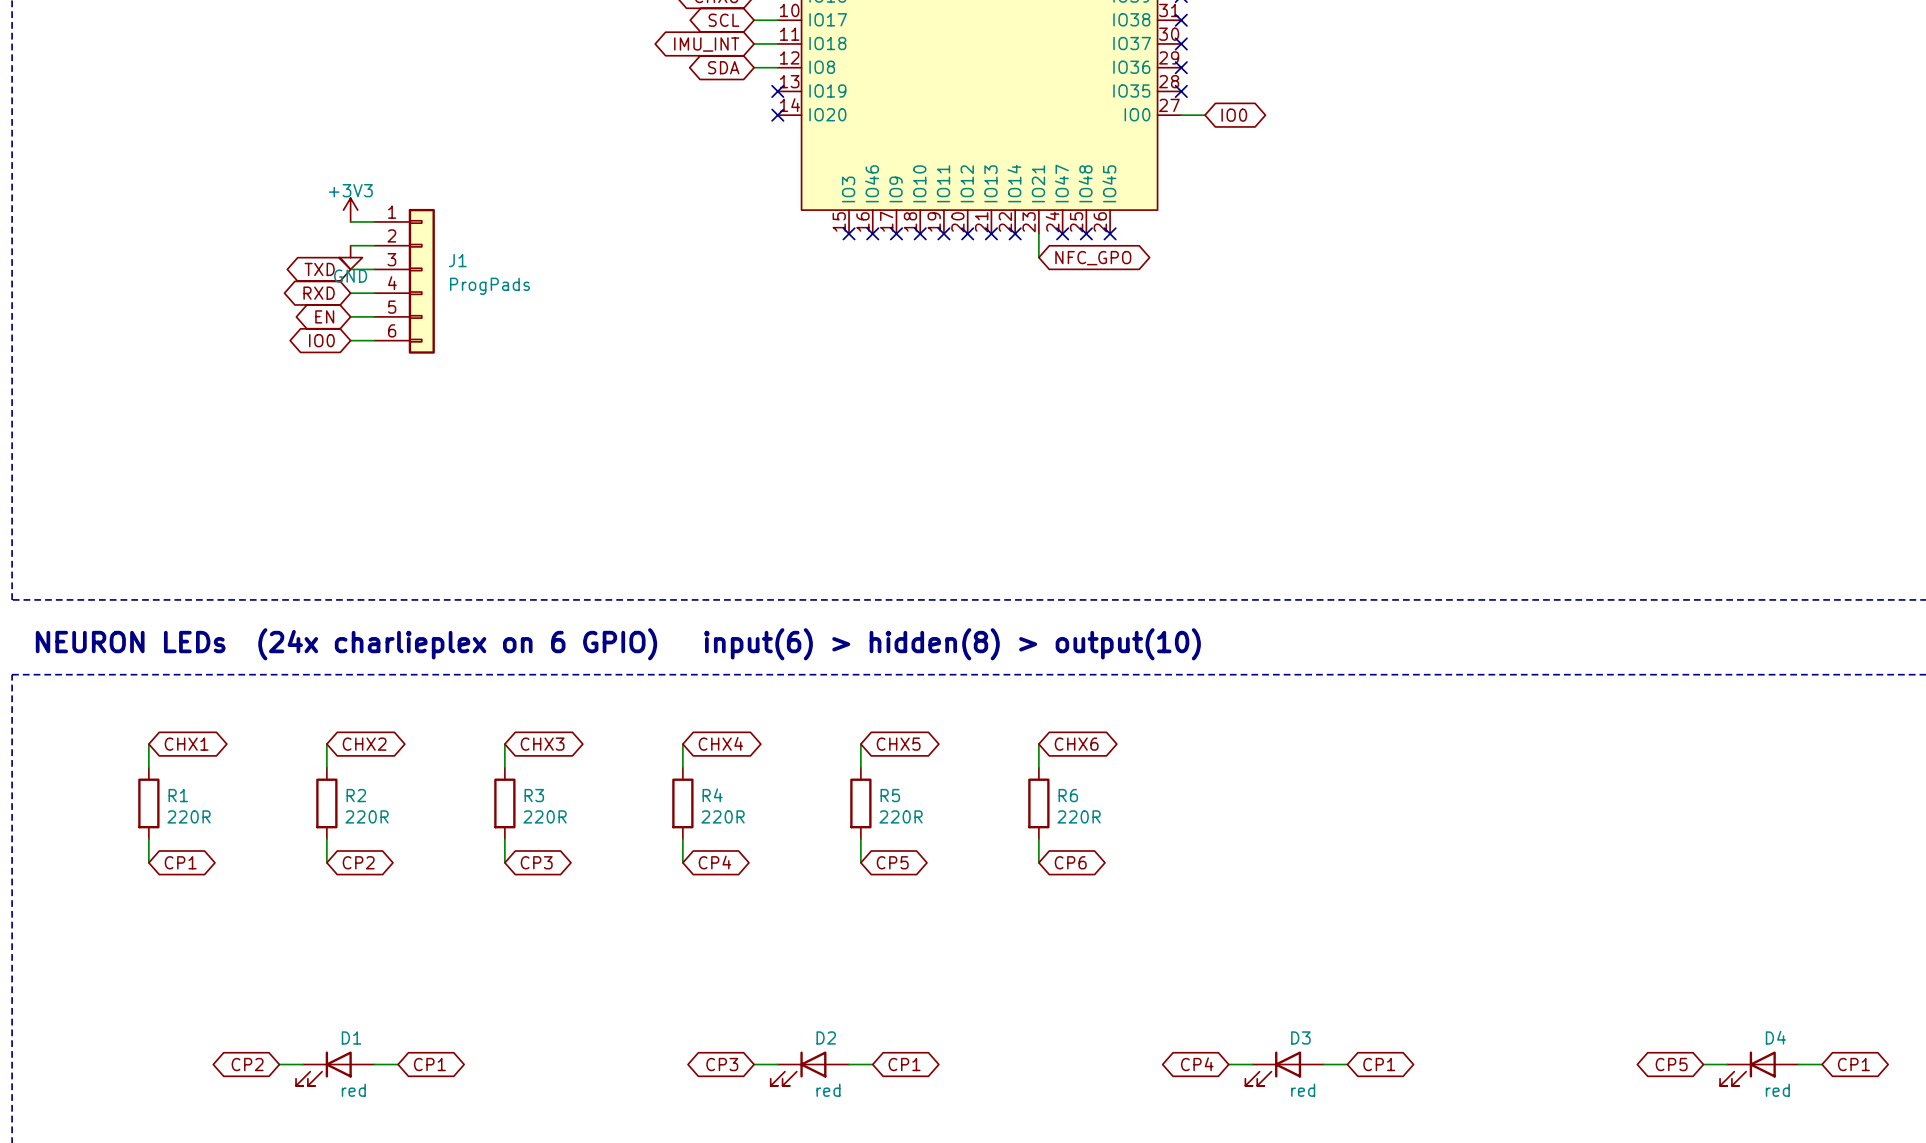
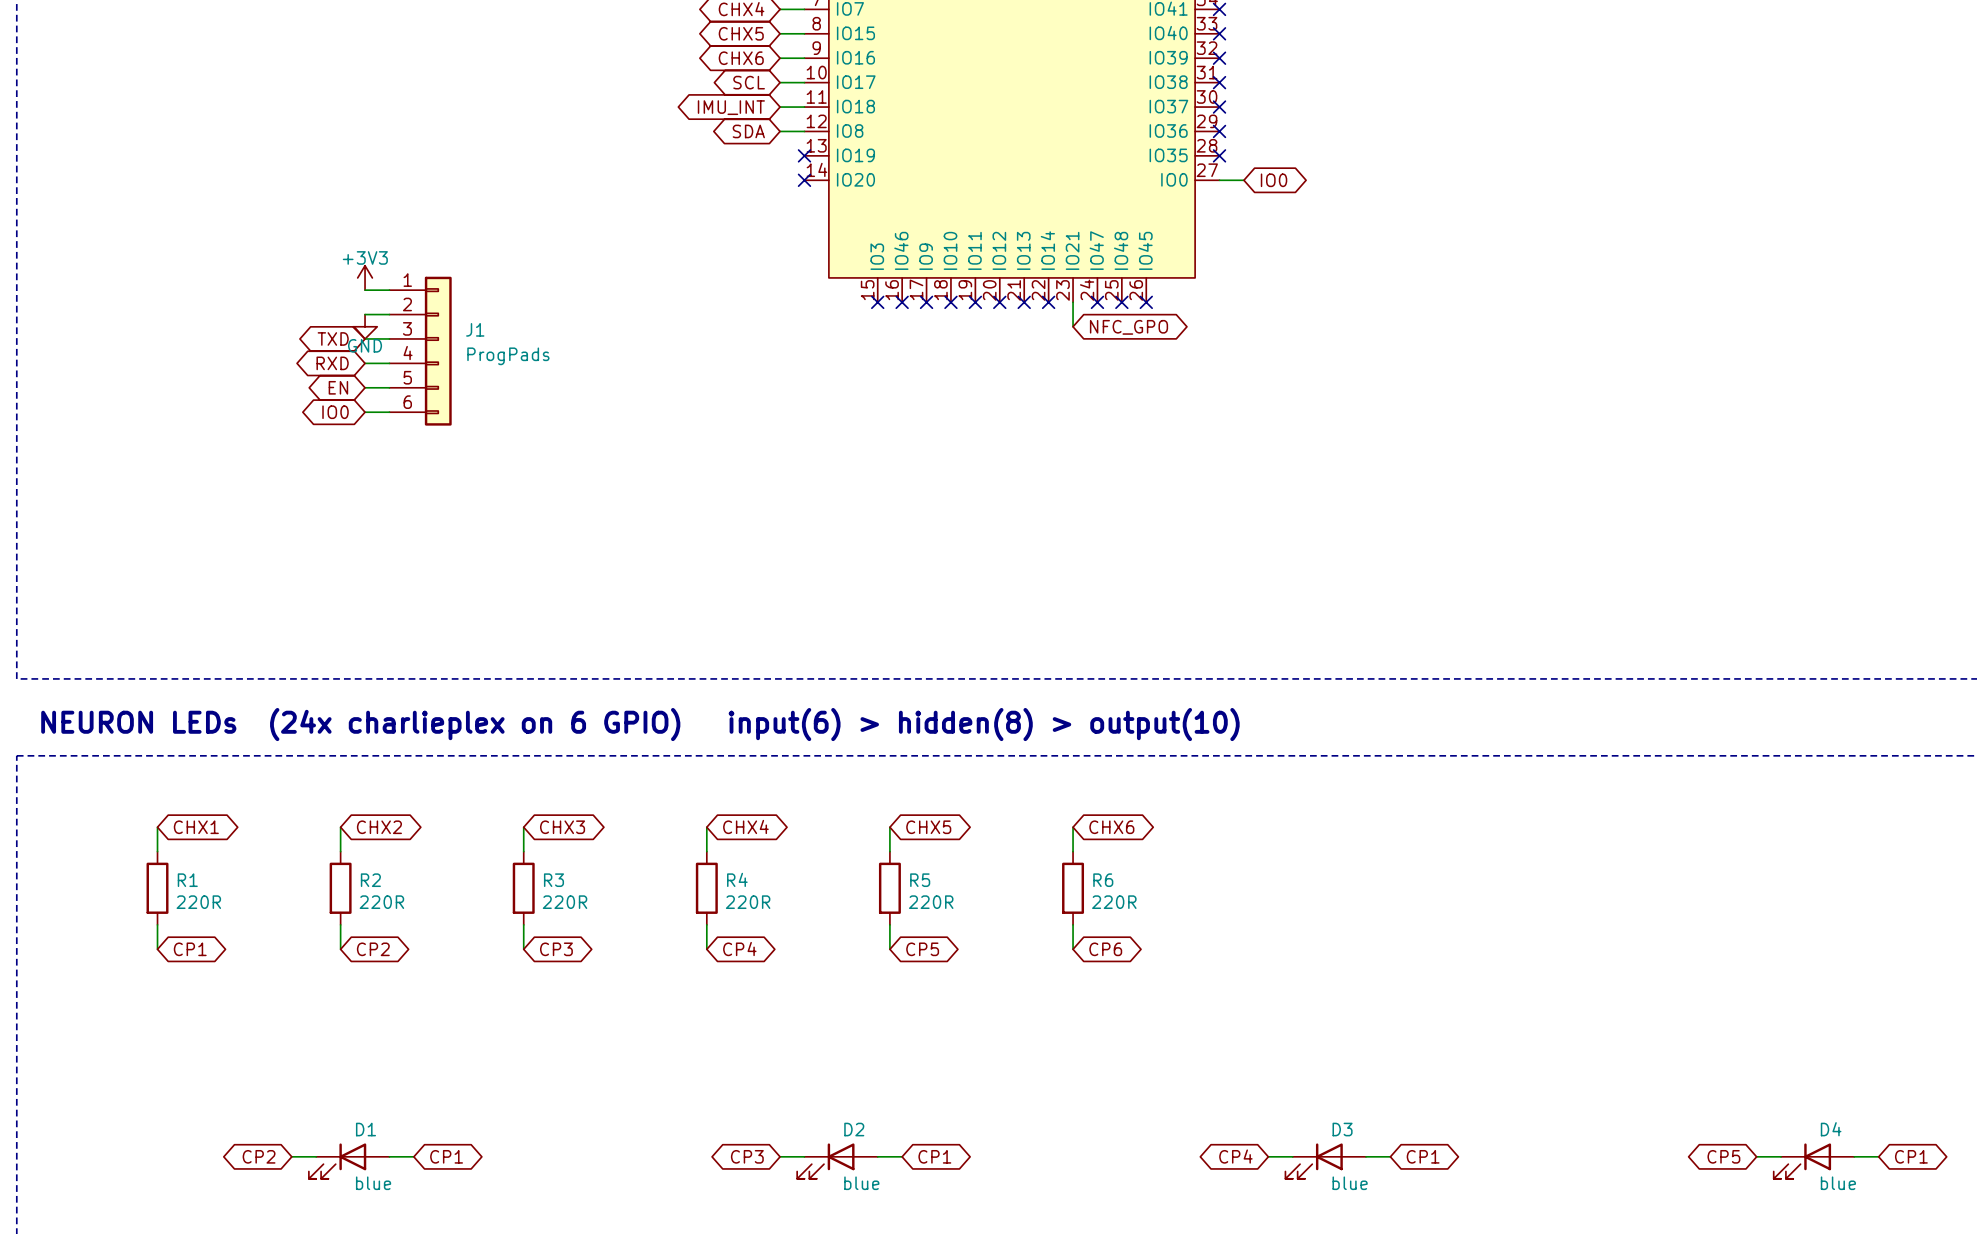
D1 value: red (353, 1090) -> blue (373, 1183)
D2 value: red (828, 1090) -> blue (861, 1183)
D3 value: red (1303, 1090) -> blue (1350, 1183)
D4 value: red (1777, 1090) -> blue (1838, 1183)

